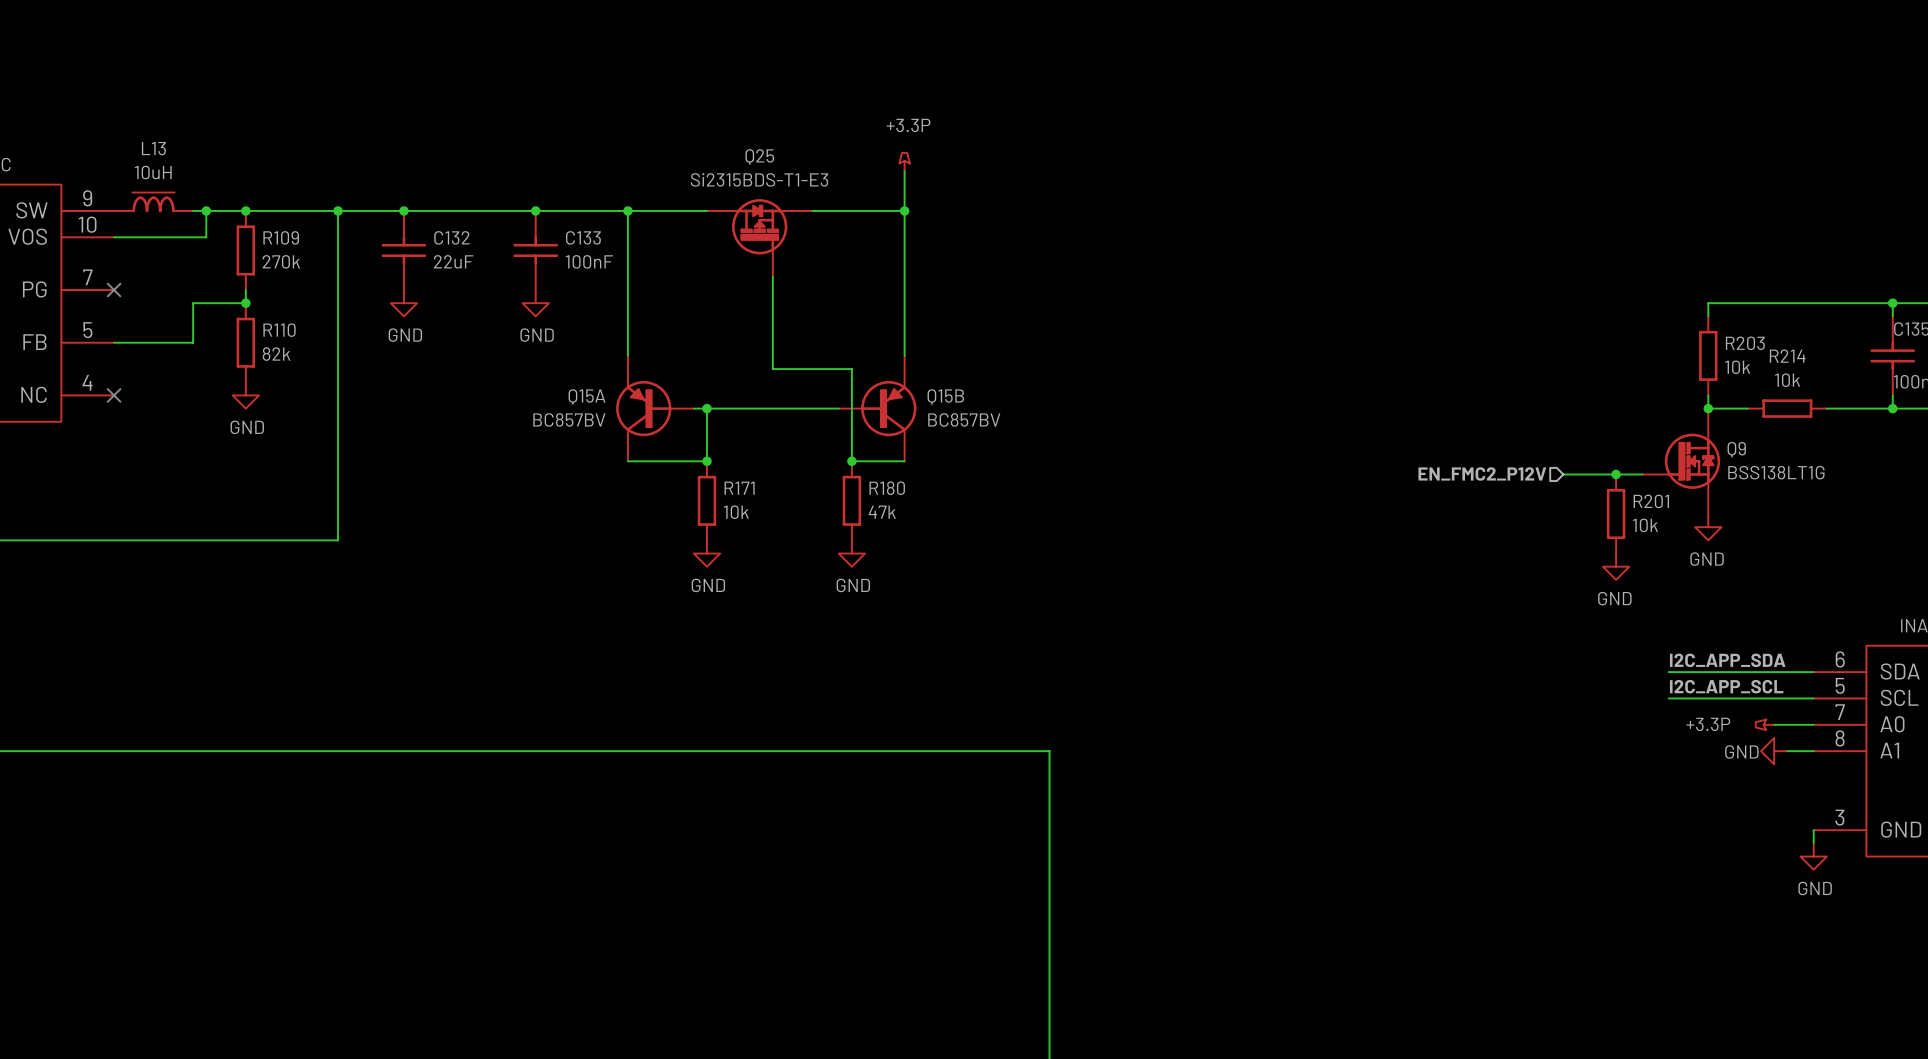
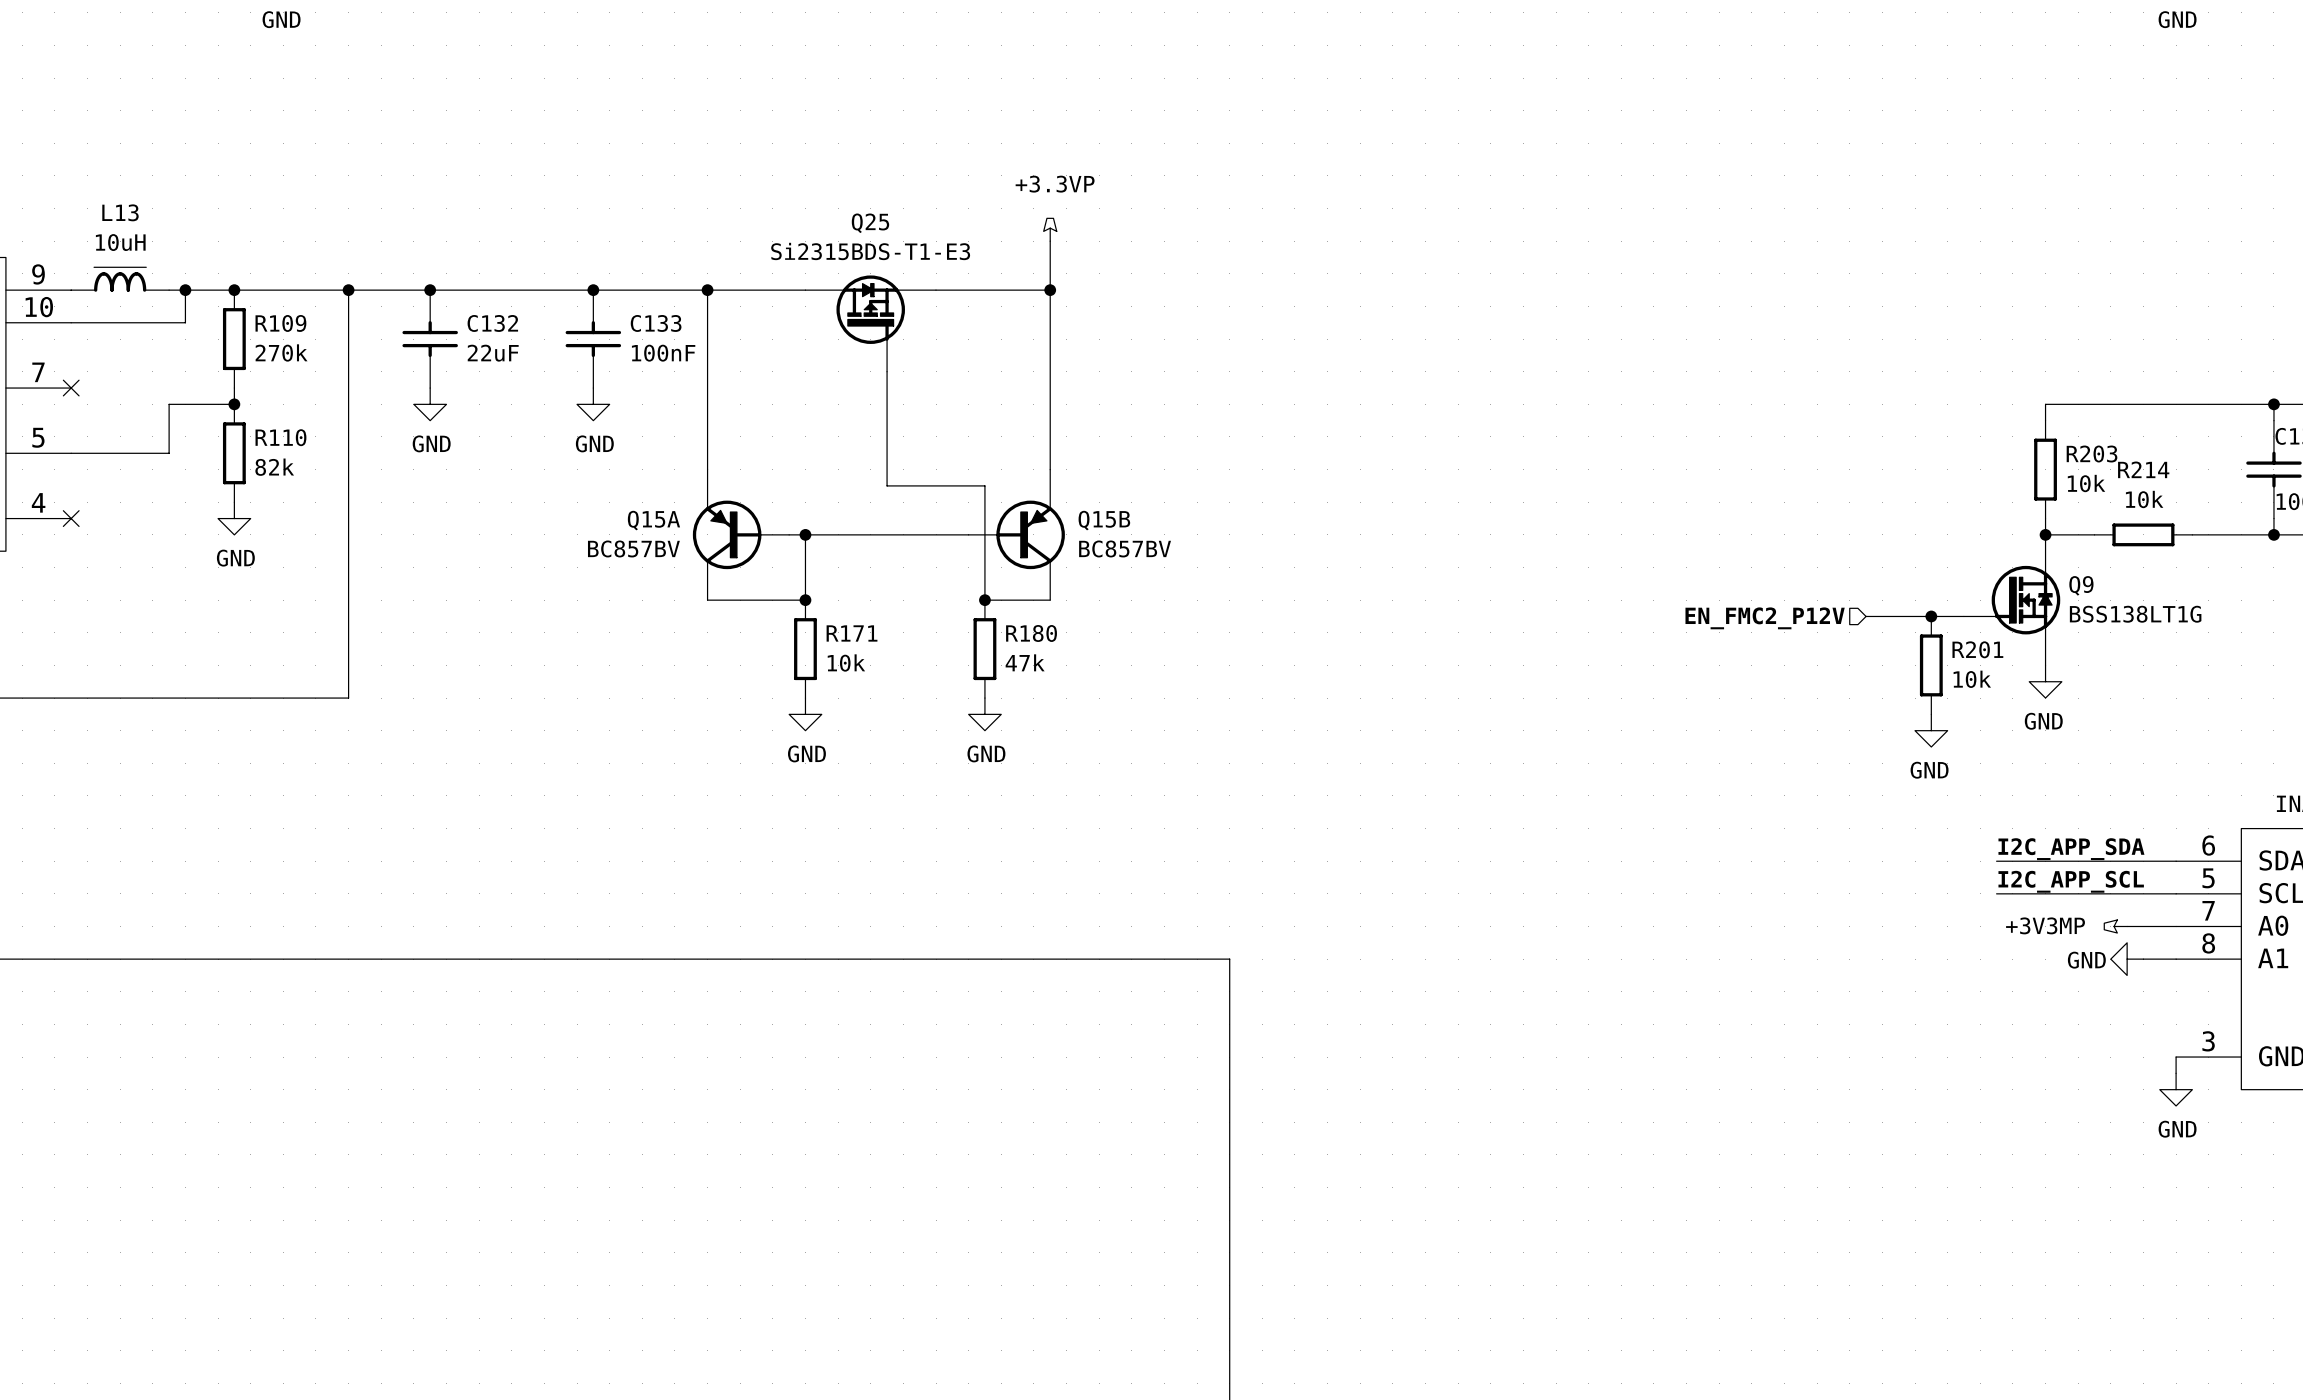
power symbol: +3.3P (904, 162) -> +3.3VP (1050, 229)
power symbol: +3.3P (1764, 724) -> +3V3MP (2115, 926)

